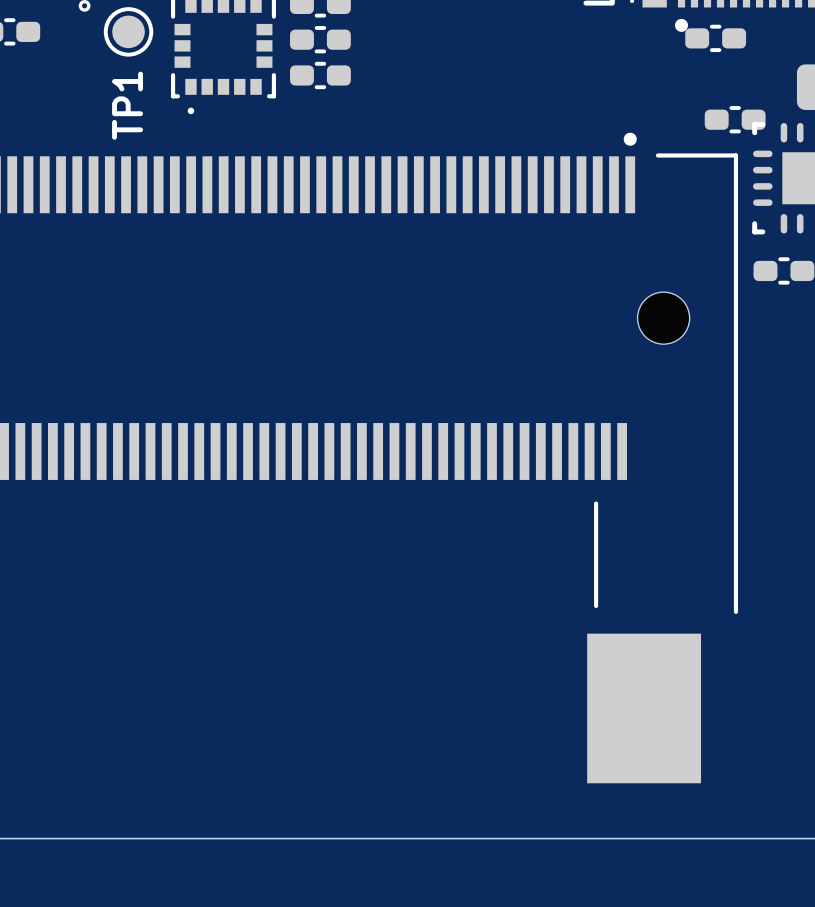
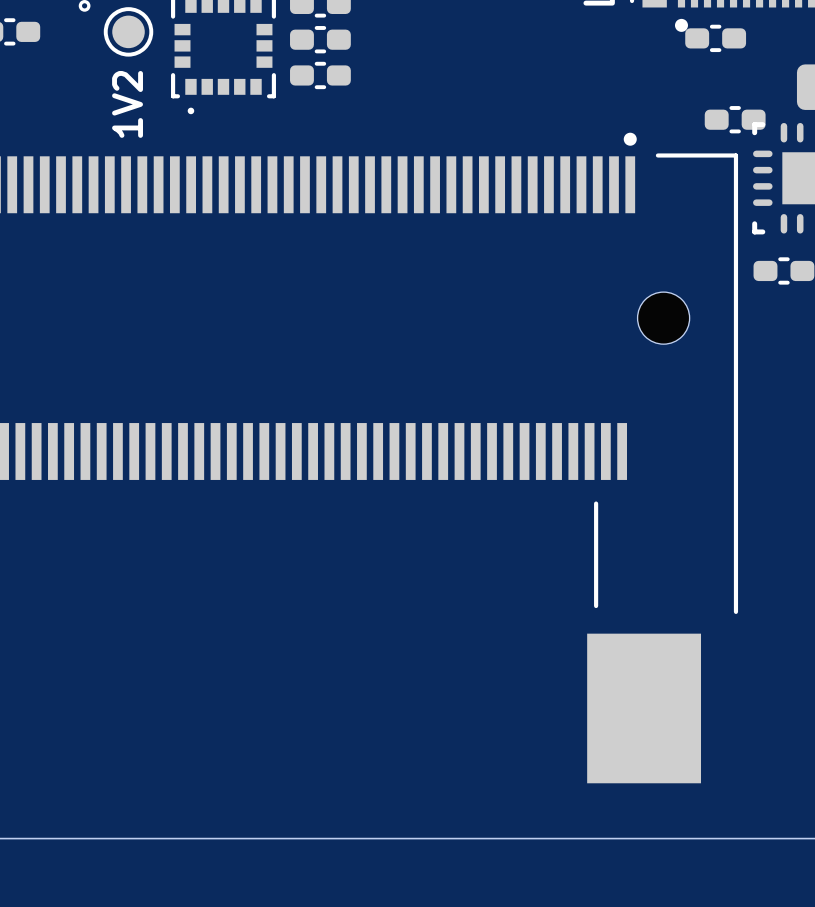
TP1 name: TP1 (127, 105) -> 1V2 (127, 104)

